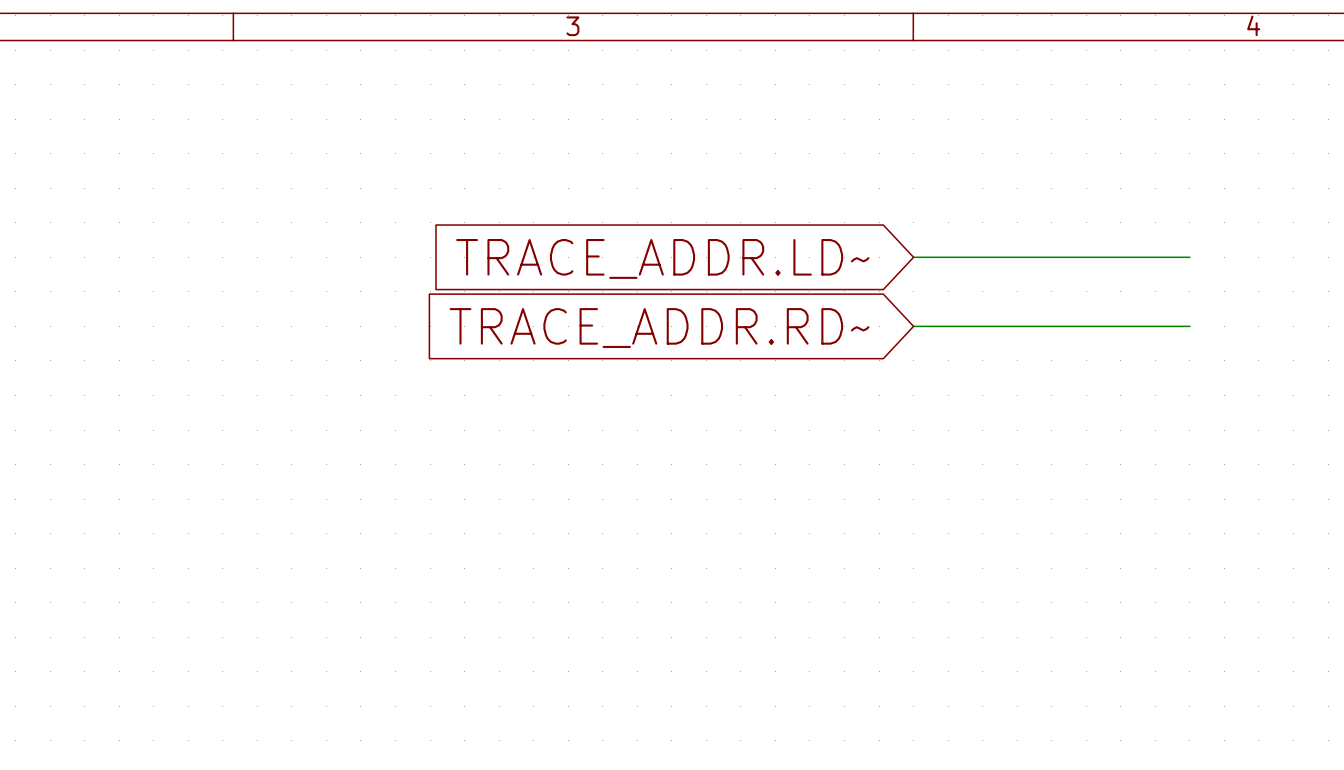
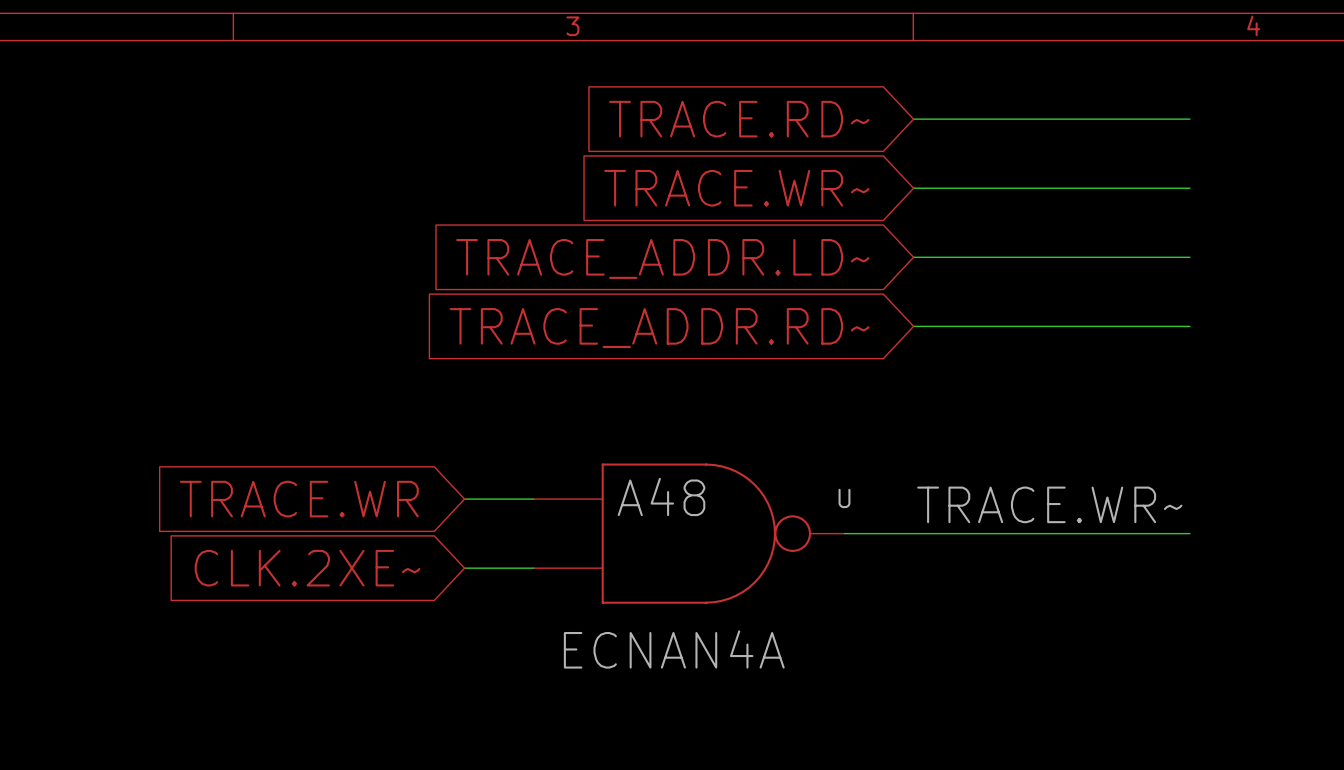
global label: none -> TRACE.RD~ (739, 119)
wire: none -> (913, 119) (1189, 119)
global label: none -> TRACE.WR~ (736, 188)
wire: none -> (913, 188) (1189, 188)
global label: none -> TRACE.WR (299, 499)
wire: none -> (464, 499) (533, 499)
label: none -> TRACE.WR~ (1049, 504)
U: none -> (689, 533)
wire: none -> (844, 533) (1189, 533)
global label: none -> CLK.2XE~ (307, 568)
wire: none -> (464, 568) (533, 568)

